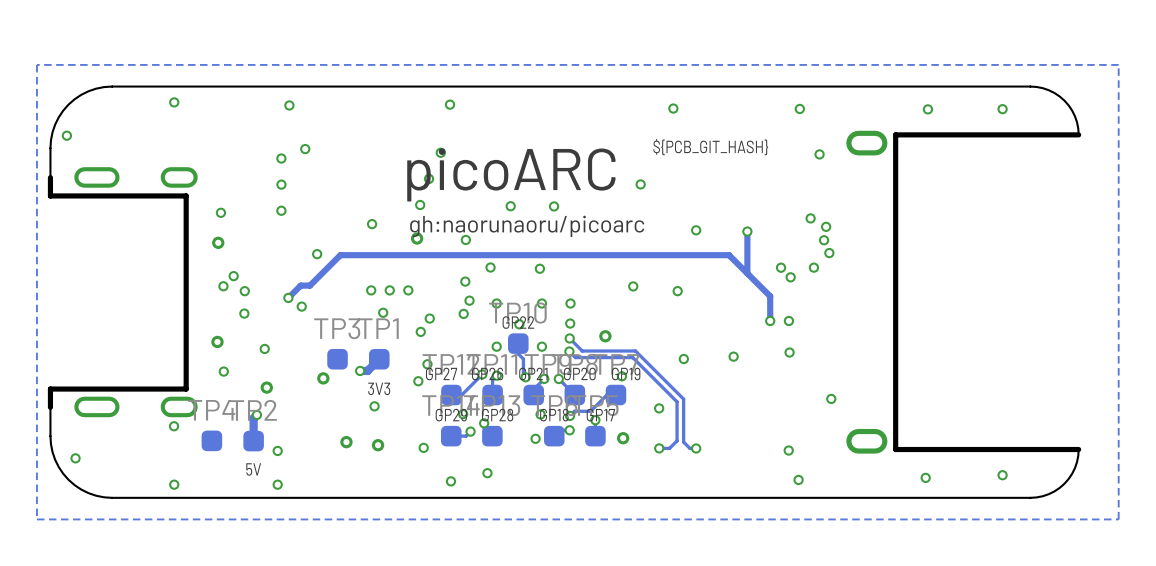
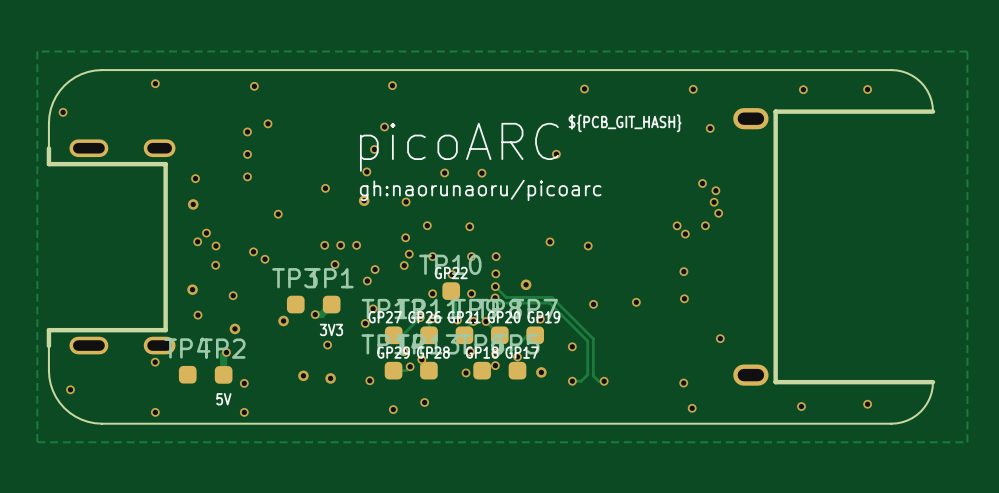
via: (696, 230) -> none
track: (747, 231) (747, 273) -> none
via: (747, 231) -> none
track: (288, 297) (300, 285) (309, 285) (340, 255) (729, 255) (770, 296) (770, 320) -> none
via: (770, 320) -> none

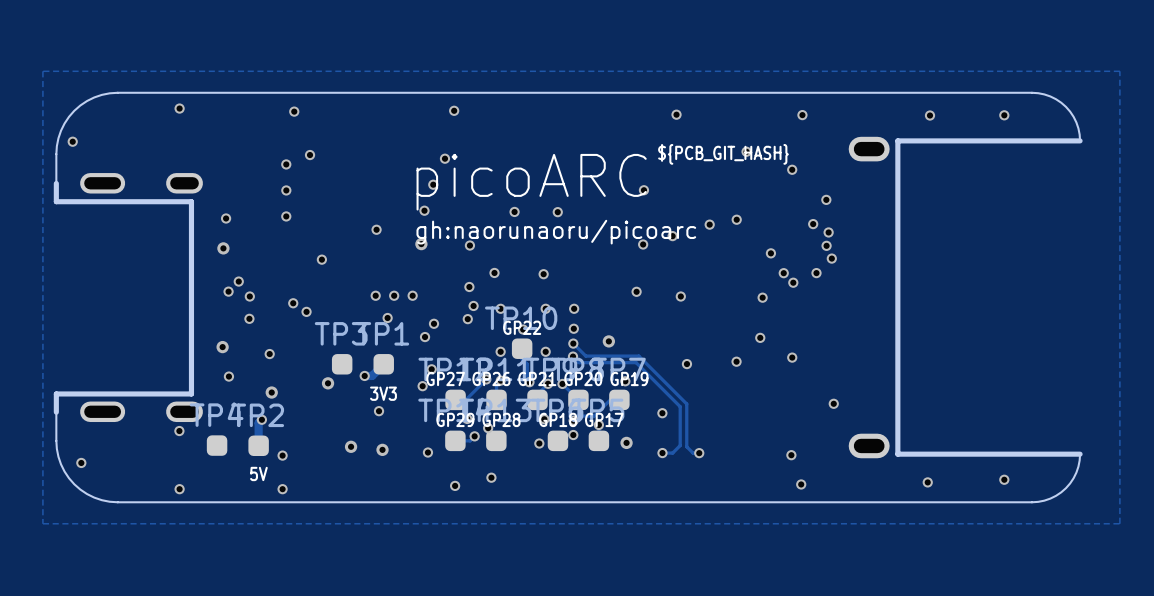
via: none -> (746, 151)
via: (710, 128) -> none
via: none -> (792, 169)
via: none -> (826, 199)
via: none -> (736, 219)
via: none -> (709, 224)
via: none -> (672, 236)
via: none -> (643, 244)
via: none -> (770, 253)
via: none -> (762, 297)
via: (683, 271) -> none
via: none -> (760, 337)

